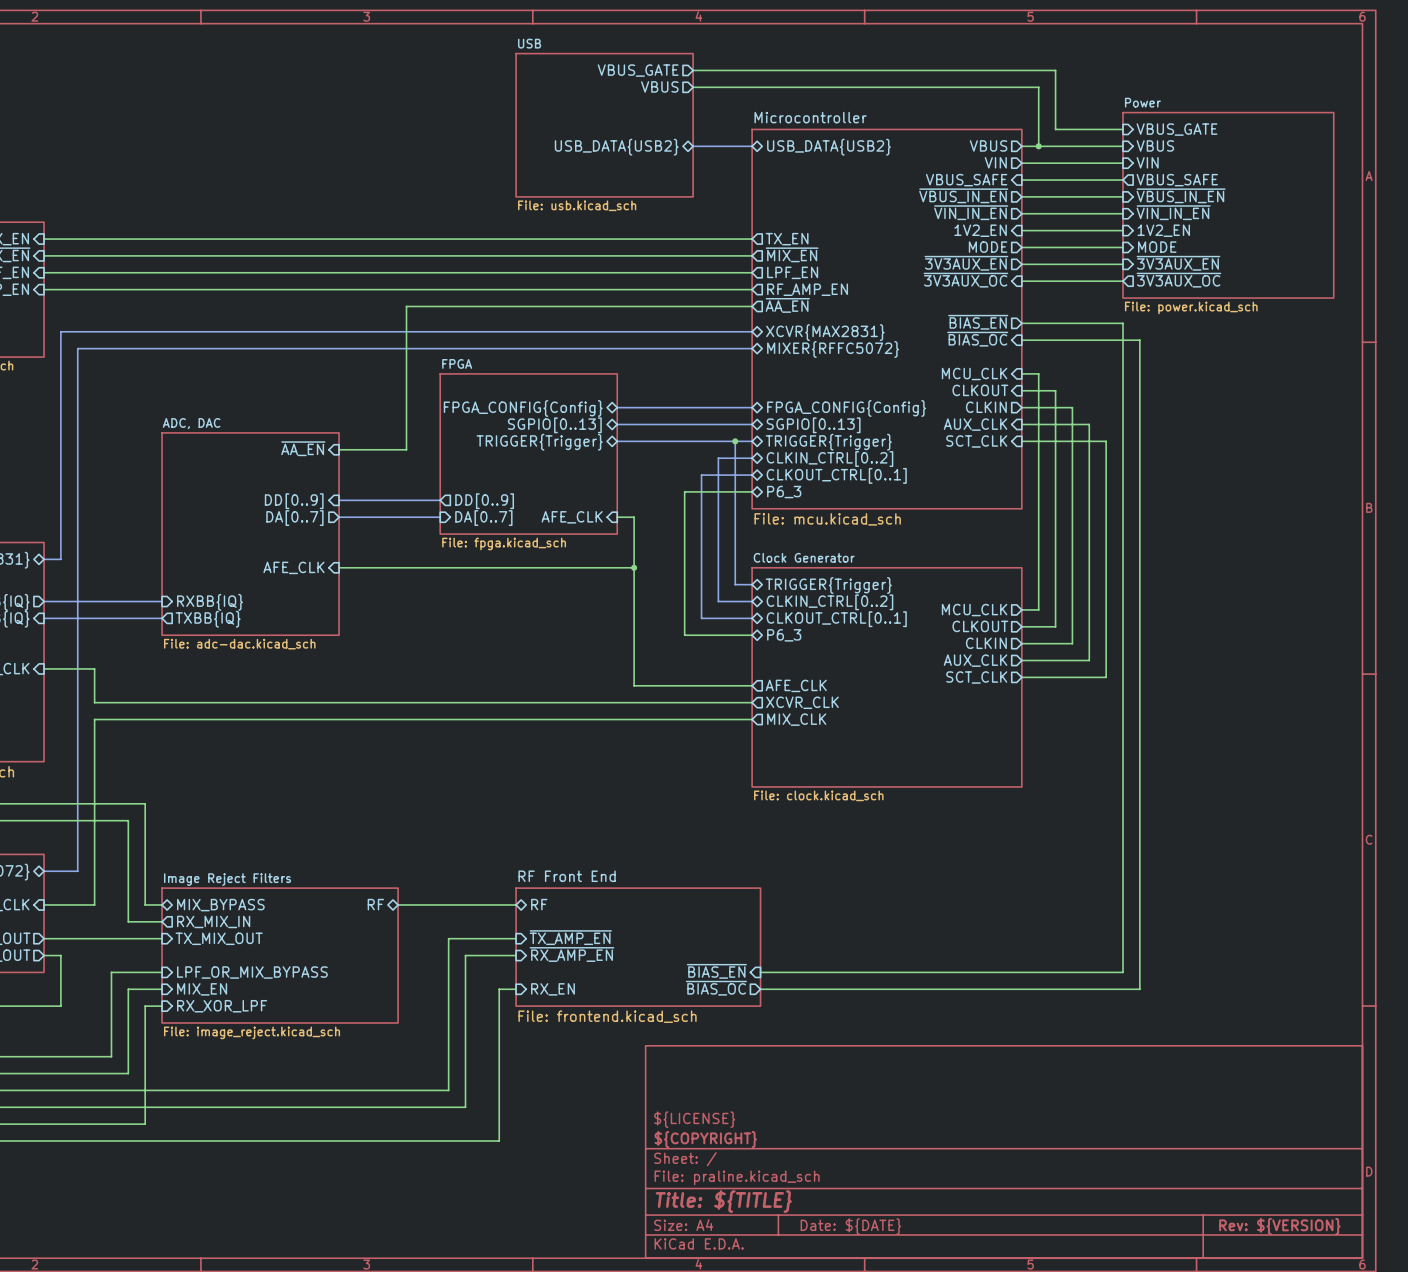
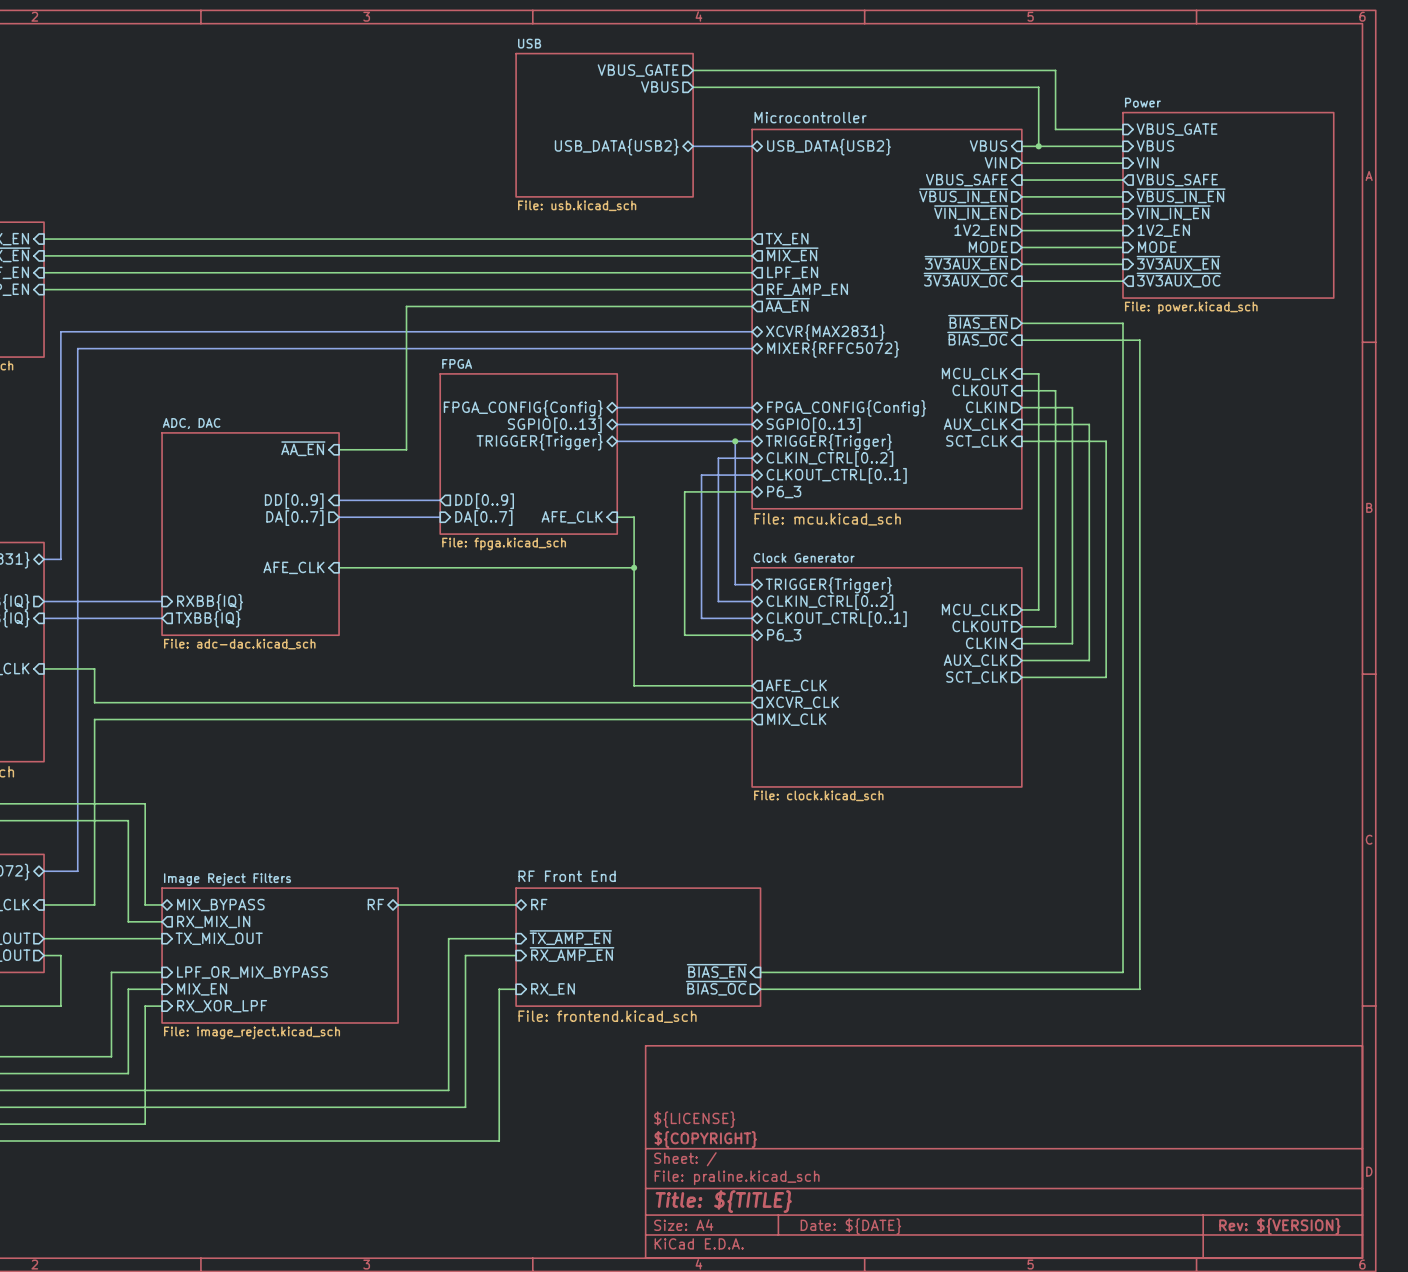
sheet pin shape: output (988, 145) -> input (988, 145)
sheet pin shape: input (980, 230) -> output (980, 230)
sheet pin shape: output (986, 643) -> input (986, 643)

